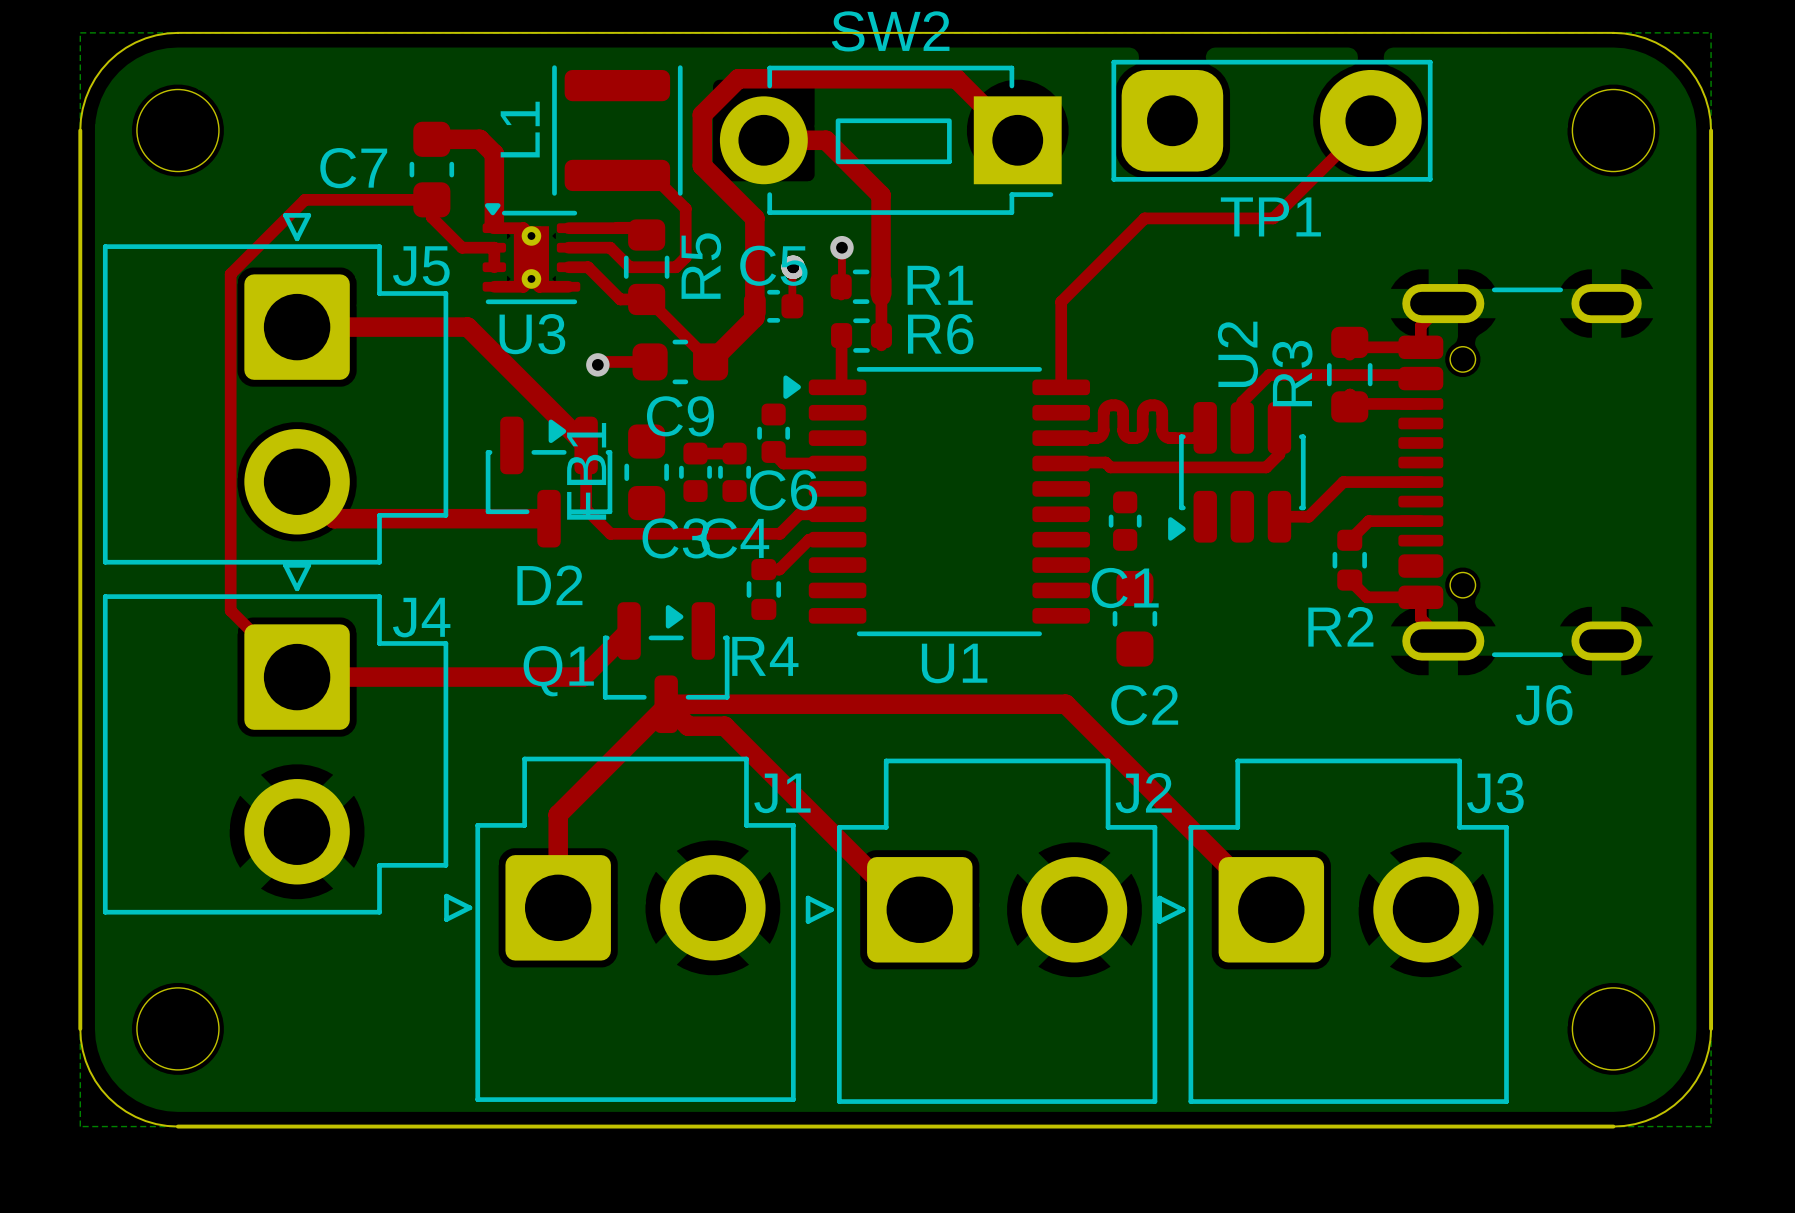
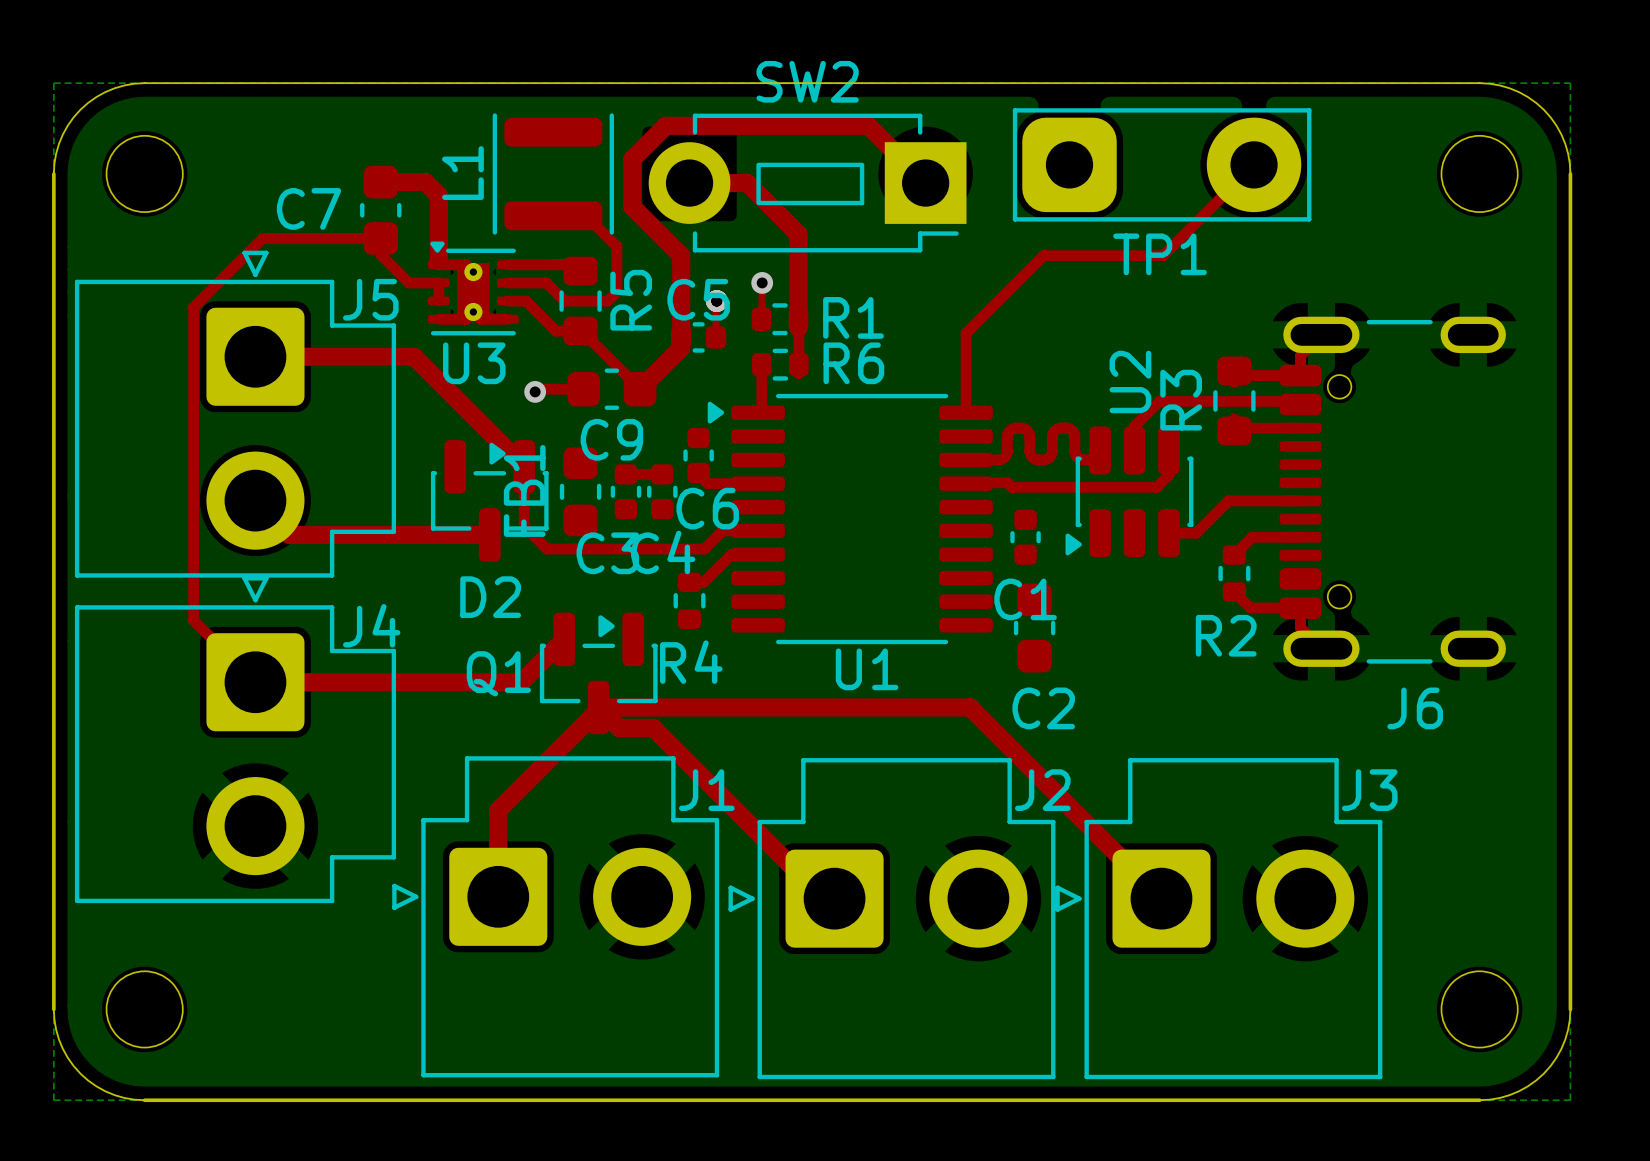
top track: (1095, 438) (1100, 436) (1103, 432) (1104, 410) (1111, 405) (1118, 405) (1122, 410) (1124, 435) (1129, 438) (1138, 437) (1142, 431) (1143, 410) (1150, 405) (1157, 405) (1161, 410) (1162, 431) (1164, 435) (1169, 438) (1187, 438) -> (998, 460) (1006, 454) (1008, 432) (1016, 428) (1023, 428) (1027, 431) (1030, 454) (1038, 460) (1046, 459) (1051, 455) (1052, 435) (1054, 430) (1060, 428) (1069, 428) (1074, 434) (1075, 454) (1083, 460)

